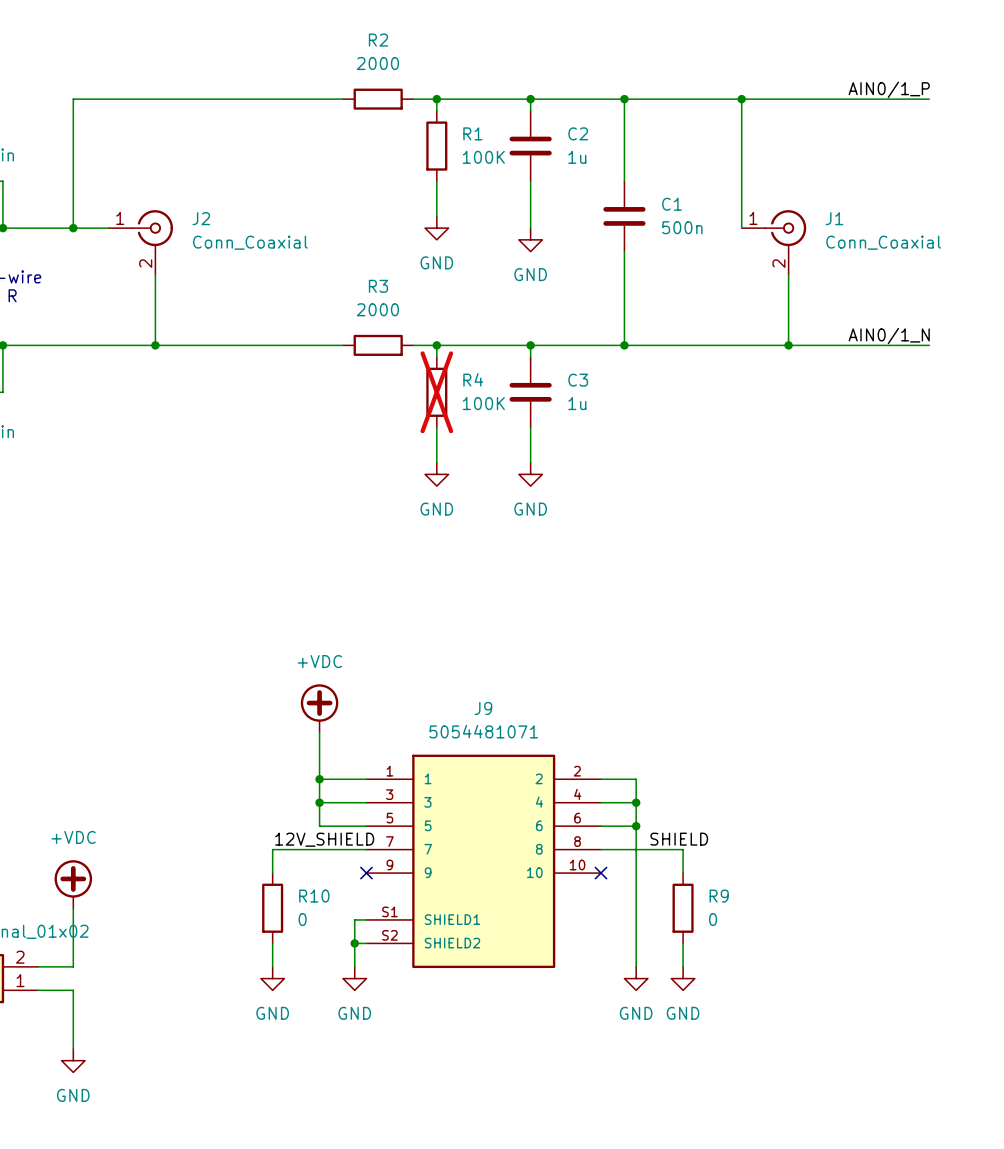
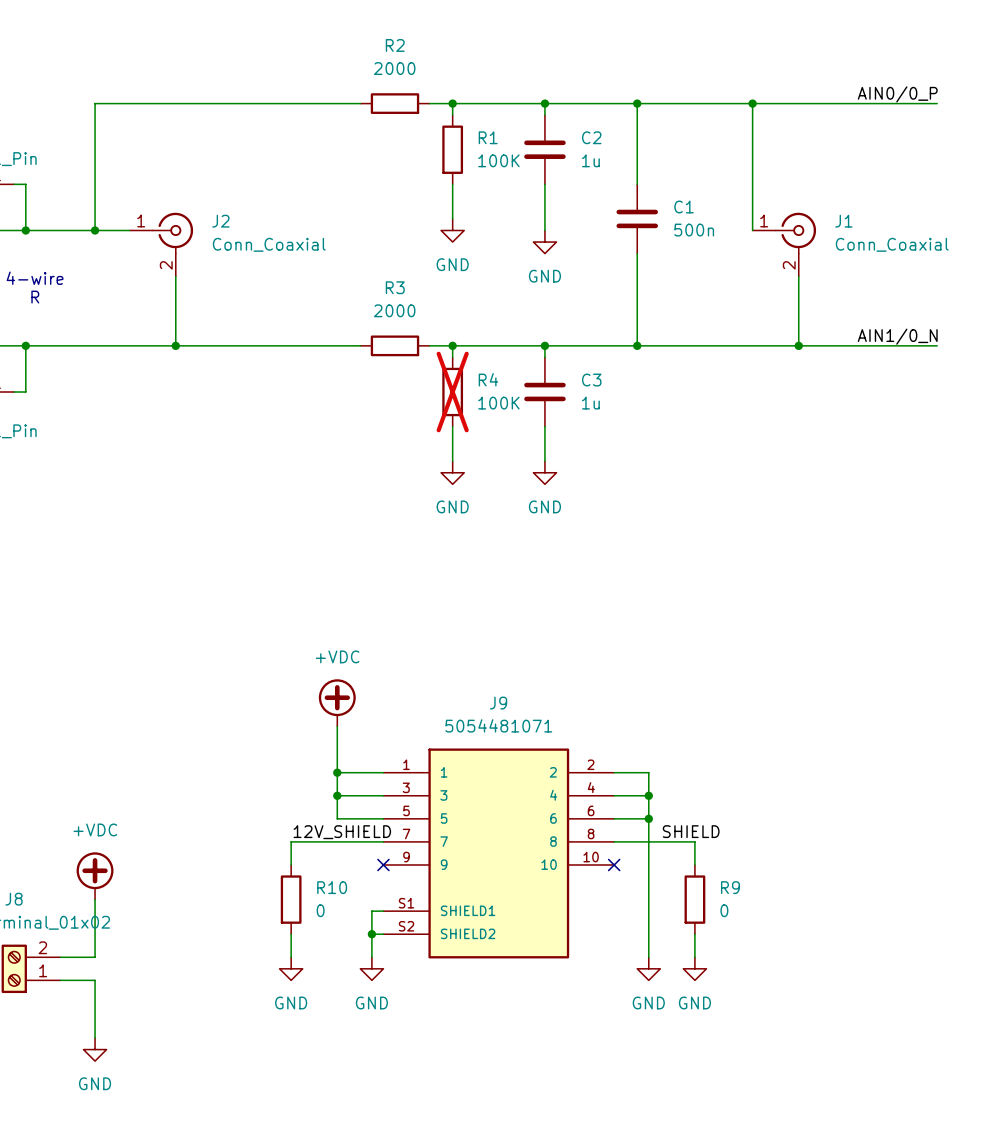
label: AIN0/1_P (889, 89) -> AIN0/0_P (897, 94)
label: AIN0/1_N (889, 336) -> AIN1/0_N (897, 336)

